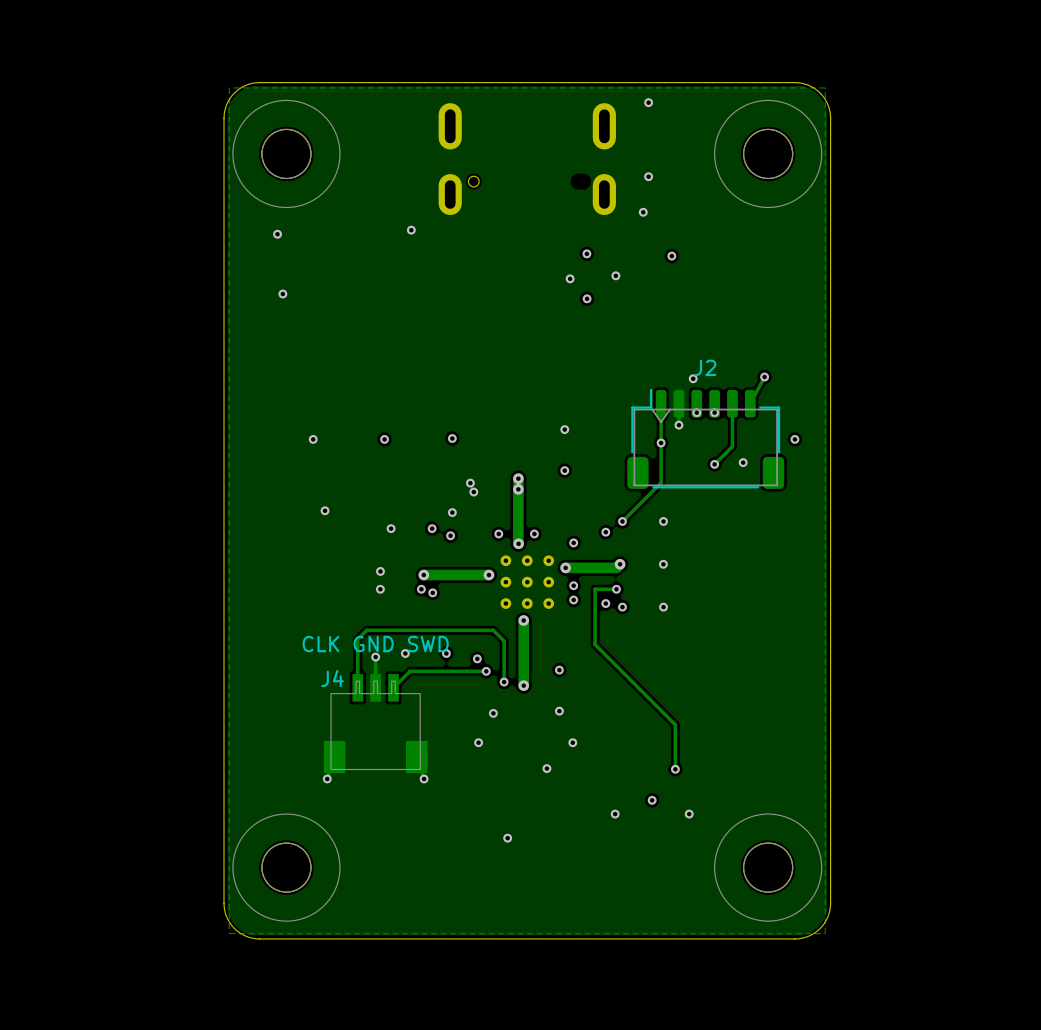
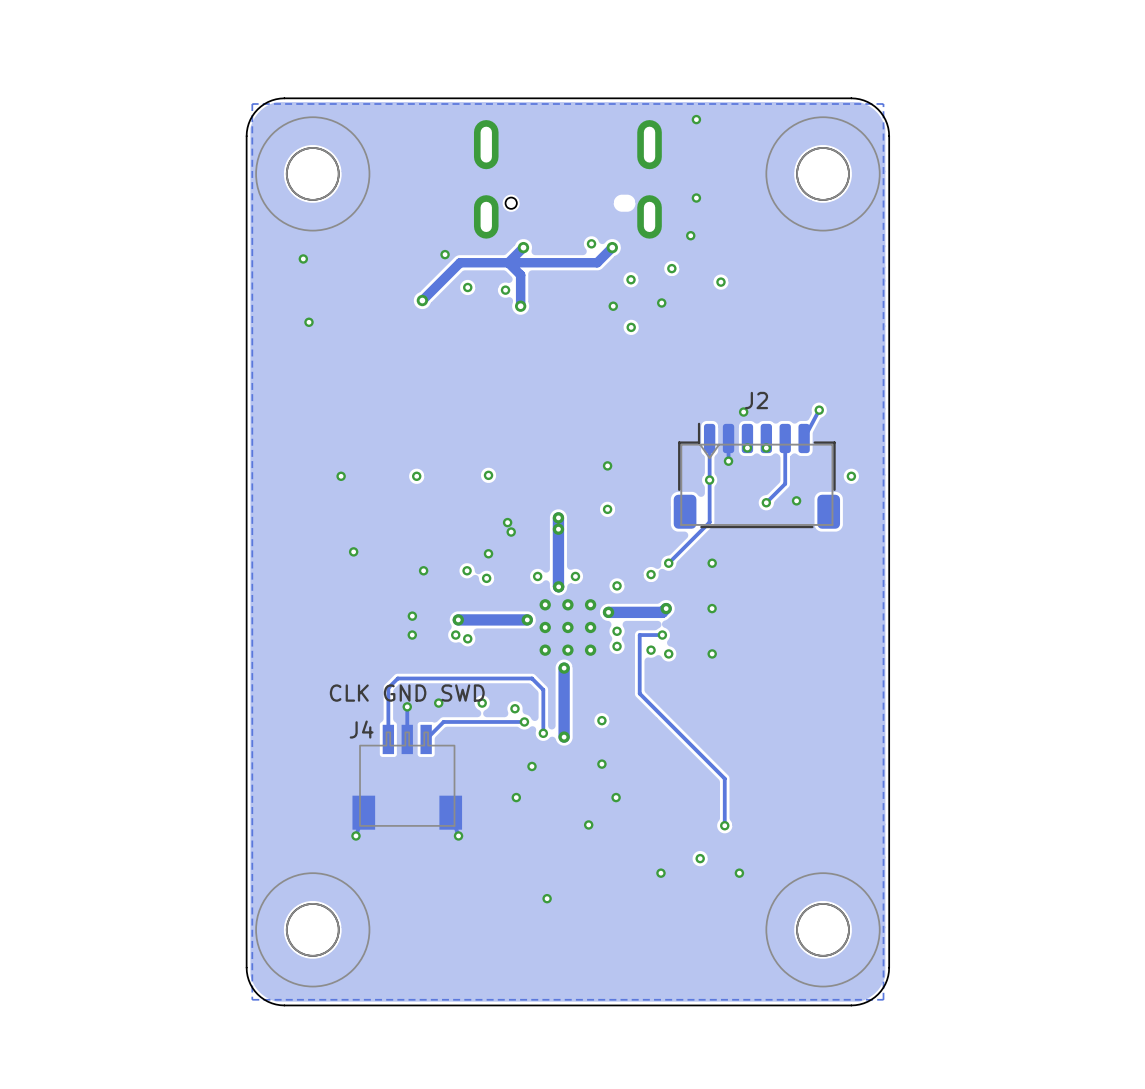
via: none -> (591, 243)
track: none -> (523, 247) (508, 262) (520, 275) (520, 306)
via: none -> (523, 247)
track: none -> (612, 247) (597, 262) (460, 262) (422, 300)
via: none -> (612, 247)
via: none -> (671, 268)
via: none -> (467, 287)
via: none -> (505, 290)
via: none -> (422, 300)
via: none -> (520, 306)

